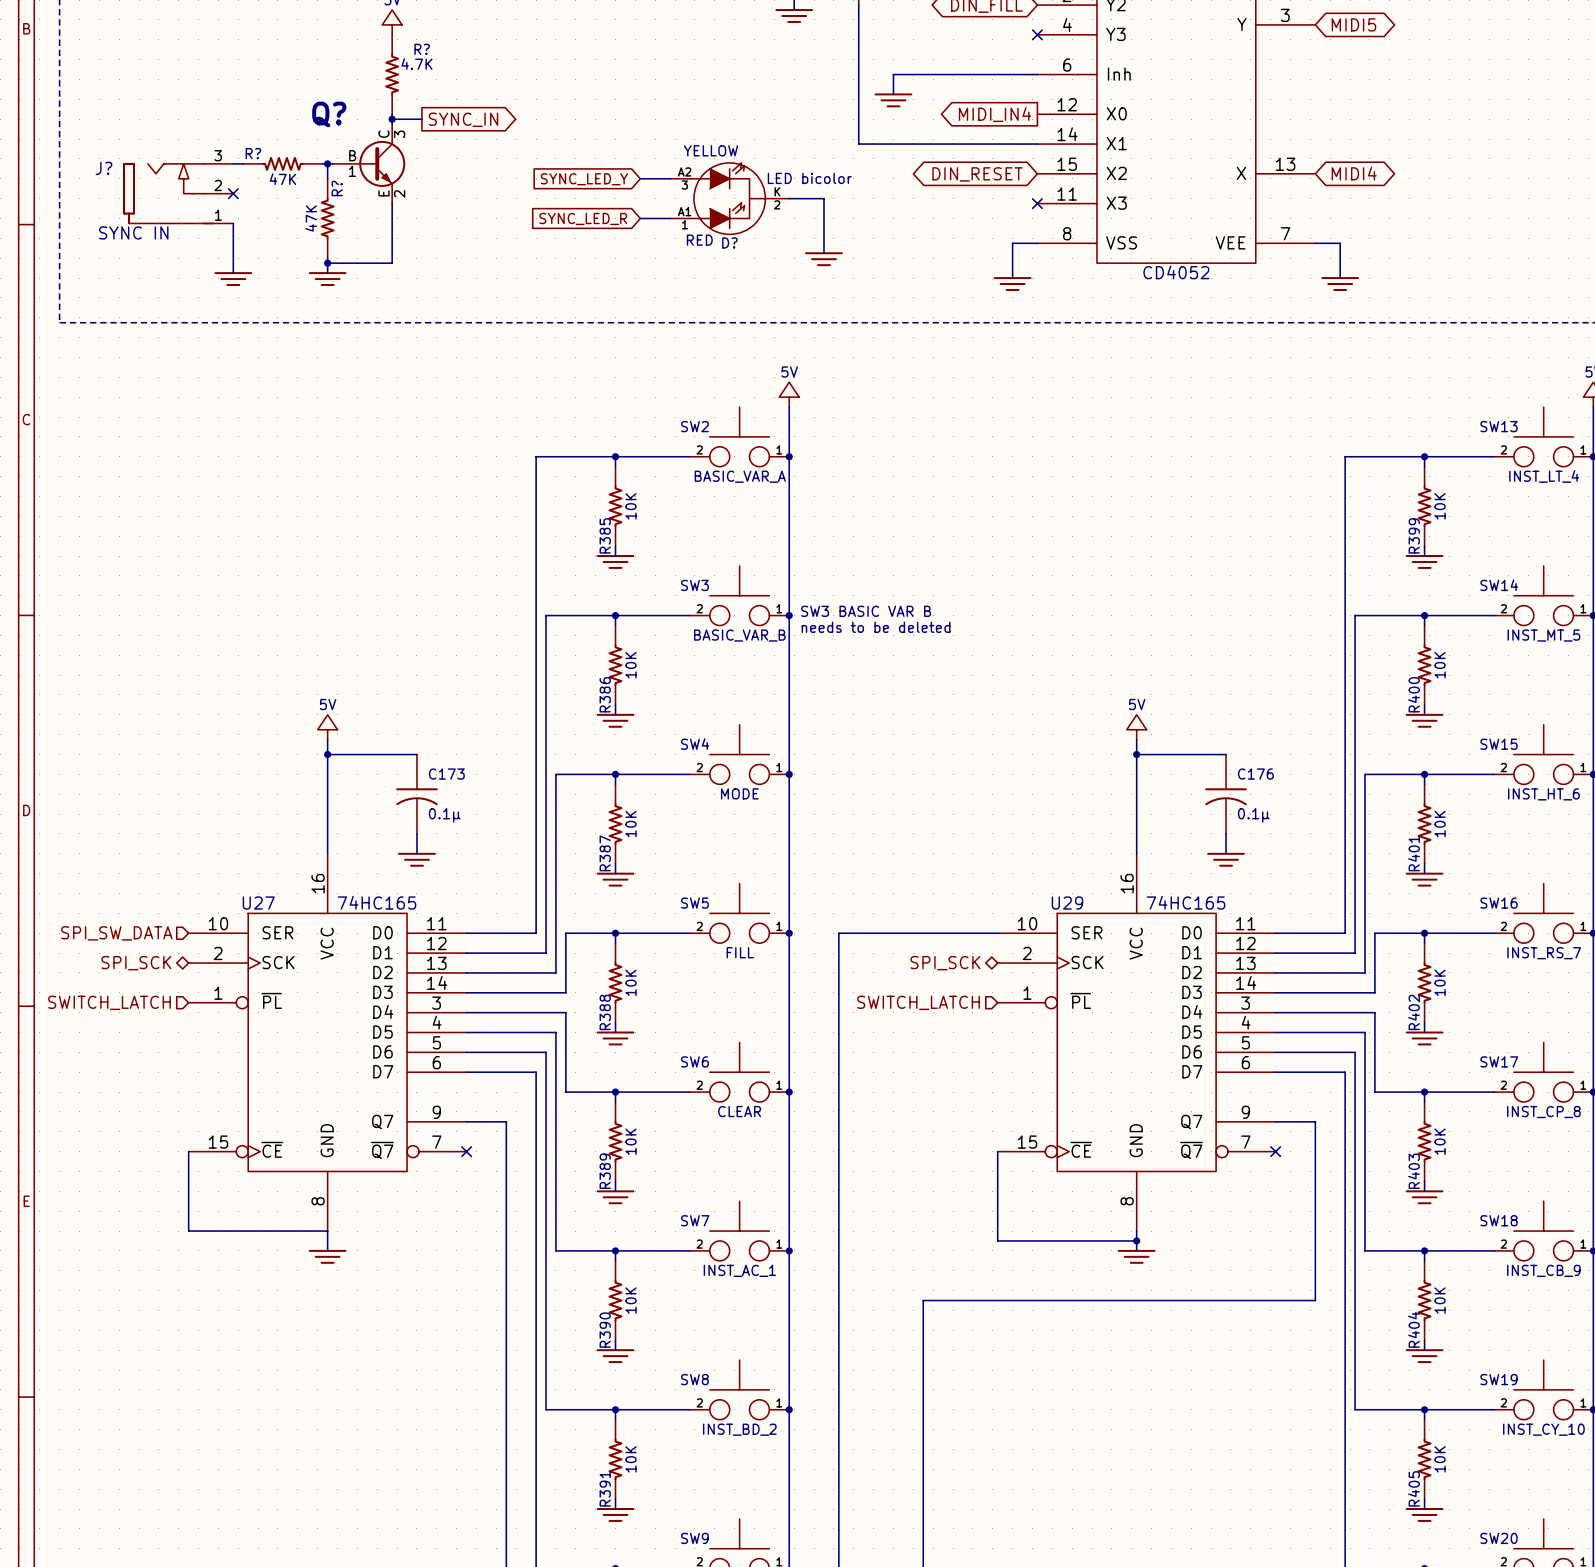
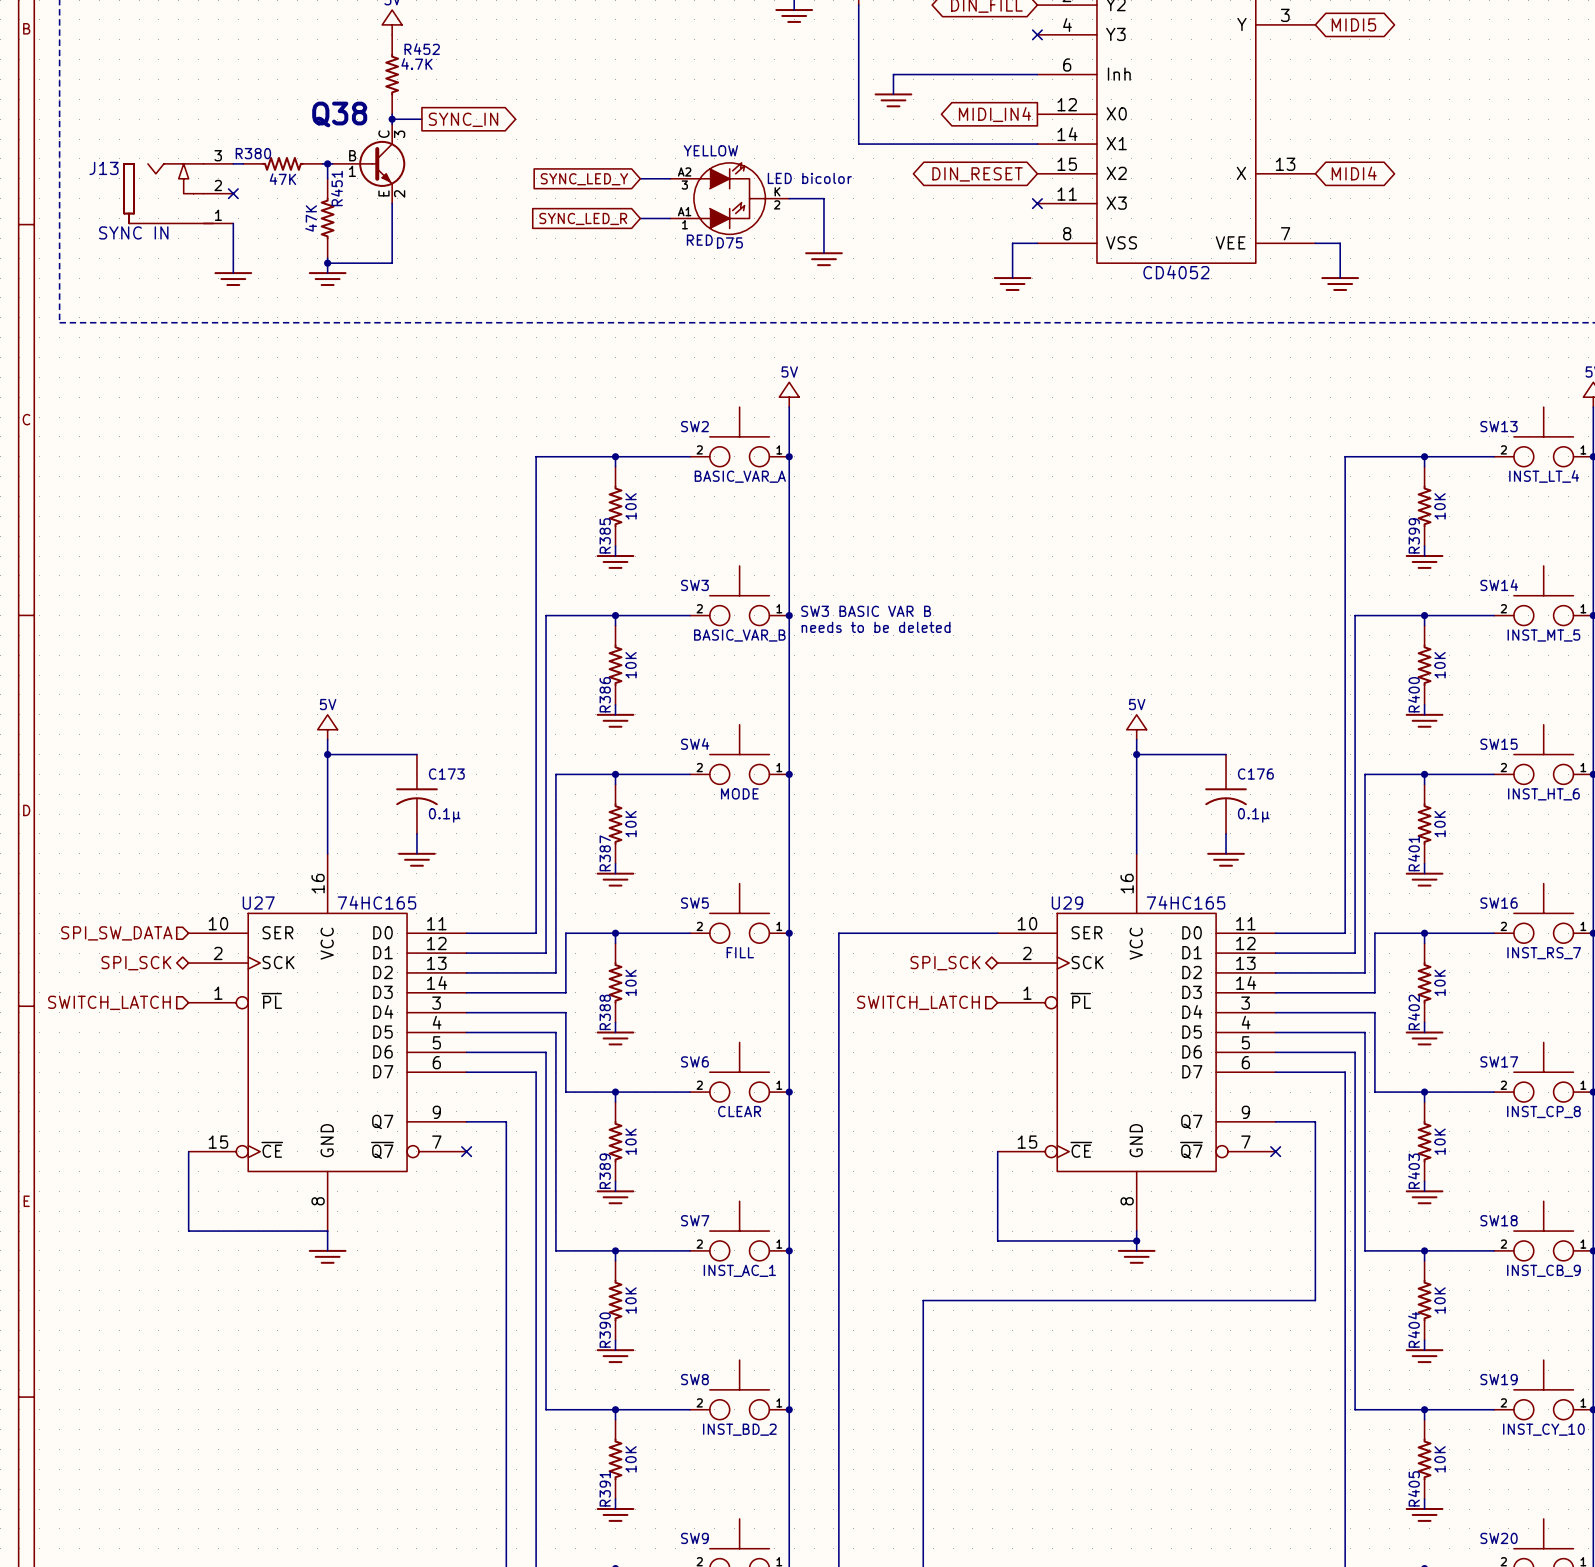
R? name: R? (422, 49) -> R452 (422, 49)
Q? name: Q? (329, 114) -> Q38 (339, 114)
R? name: R? (253, 153) -> R380 (253, 153)
J? name: J? (103, 168) -> J13 (103, 168)
R? name: R? (337, 188) -> R451 (336, 188)
D? name: D? (729, 242) -> D75 (729, 242)

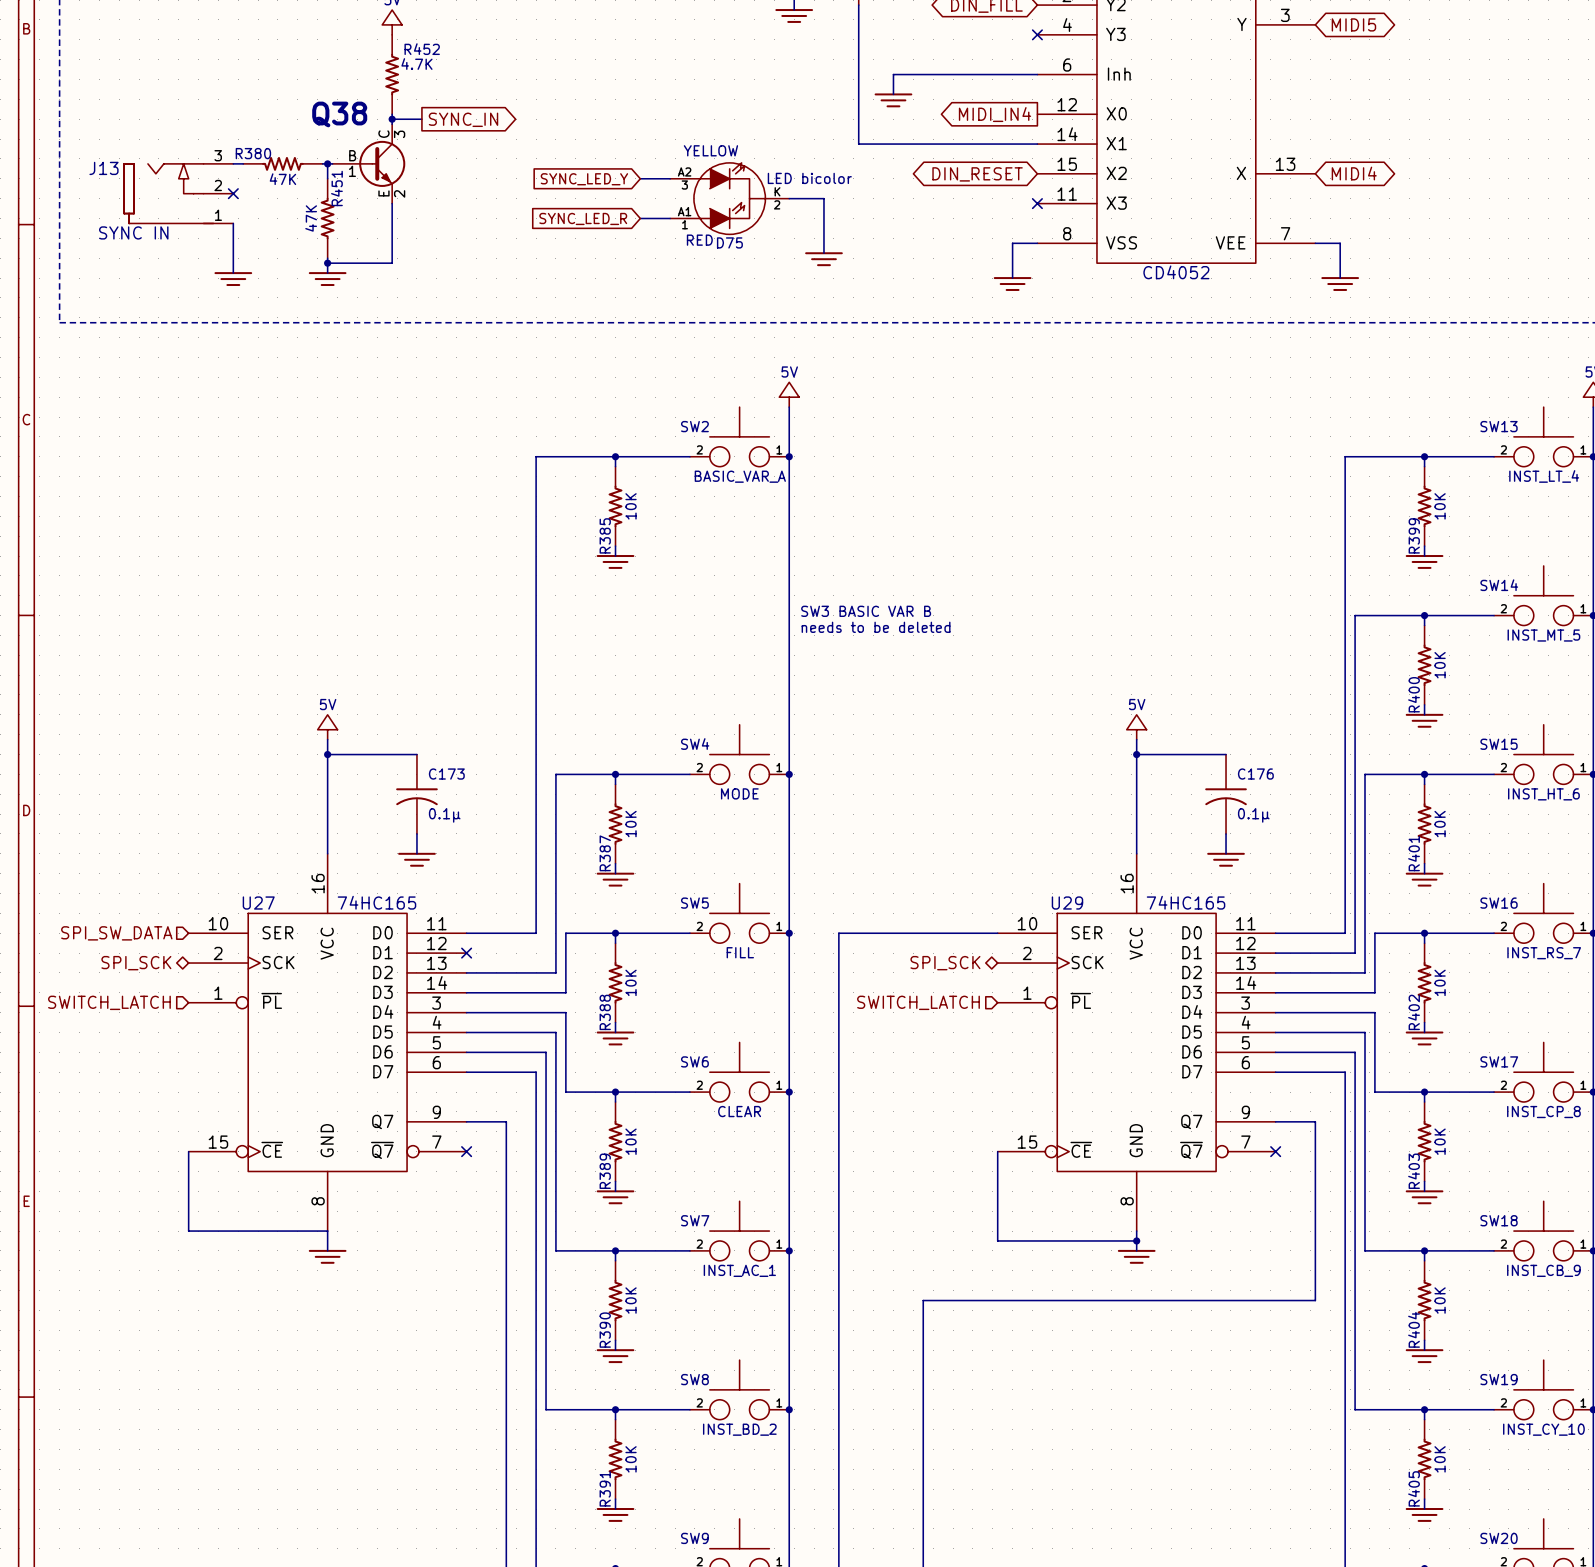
SW3: BASIC_VAR_B (739, 595) -> none
wire: (615, 615) (615, 625) -> none
junction: (615, 615) -> none
wire: (689, 615) (546, 615) (546, 953) (466, 953) -> none
junction: (789, 615) -> none
R386: 10K (615, 665) -> none
wire: (615, 704) (615, 714) -> none
power symbol: (615, 720) -> none
no-connect mark: none -> (466, 953)

